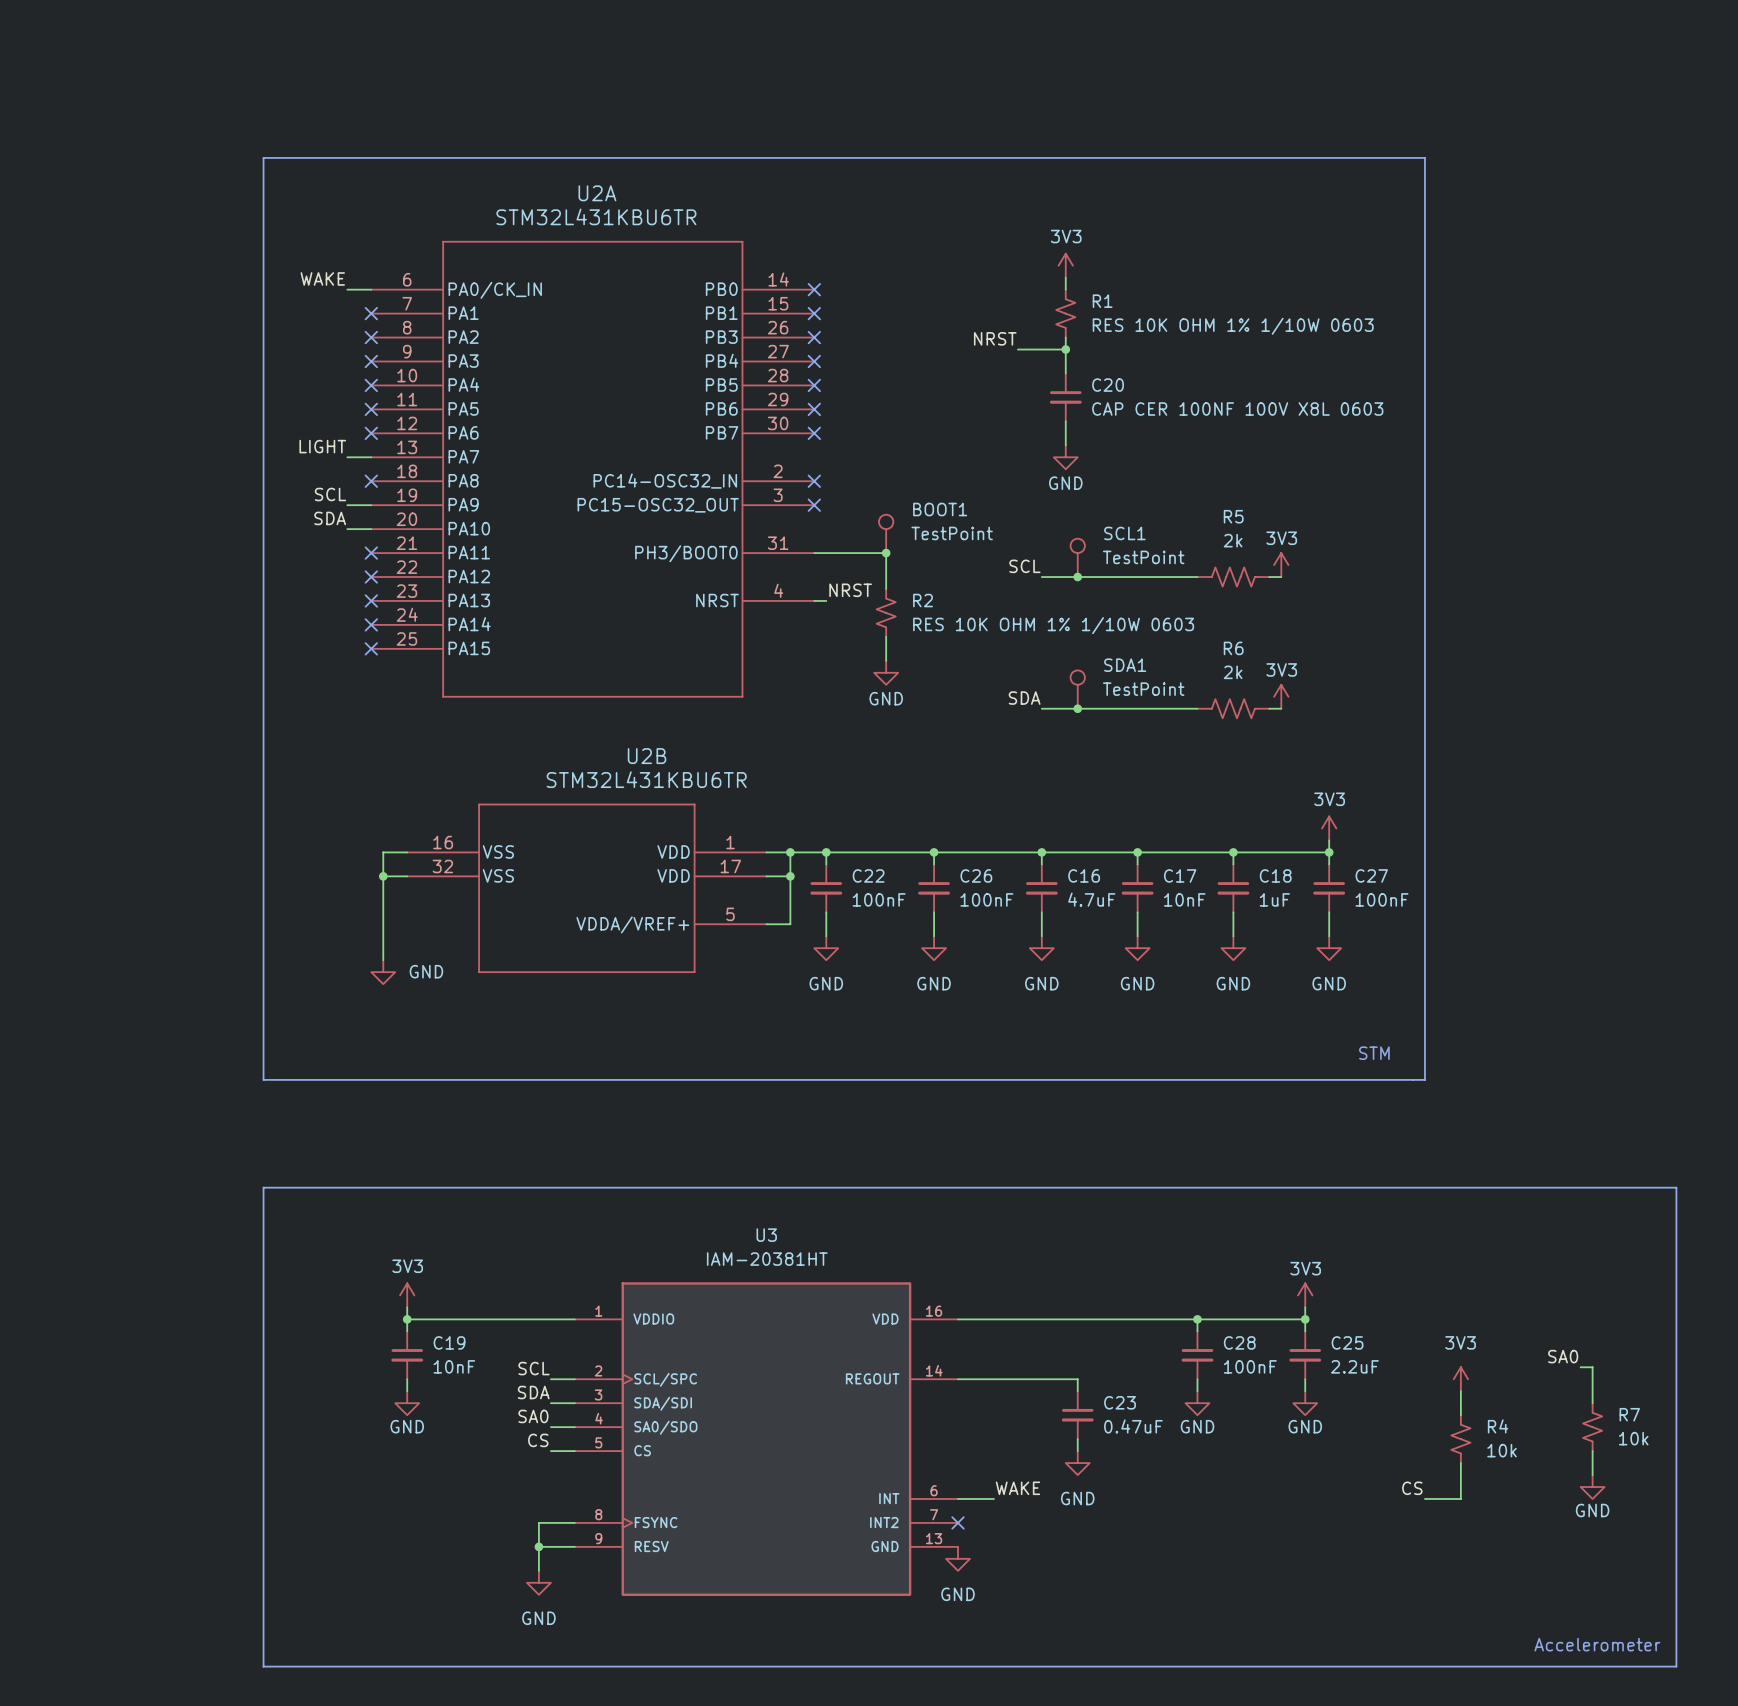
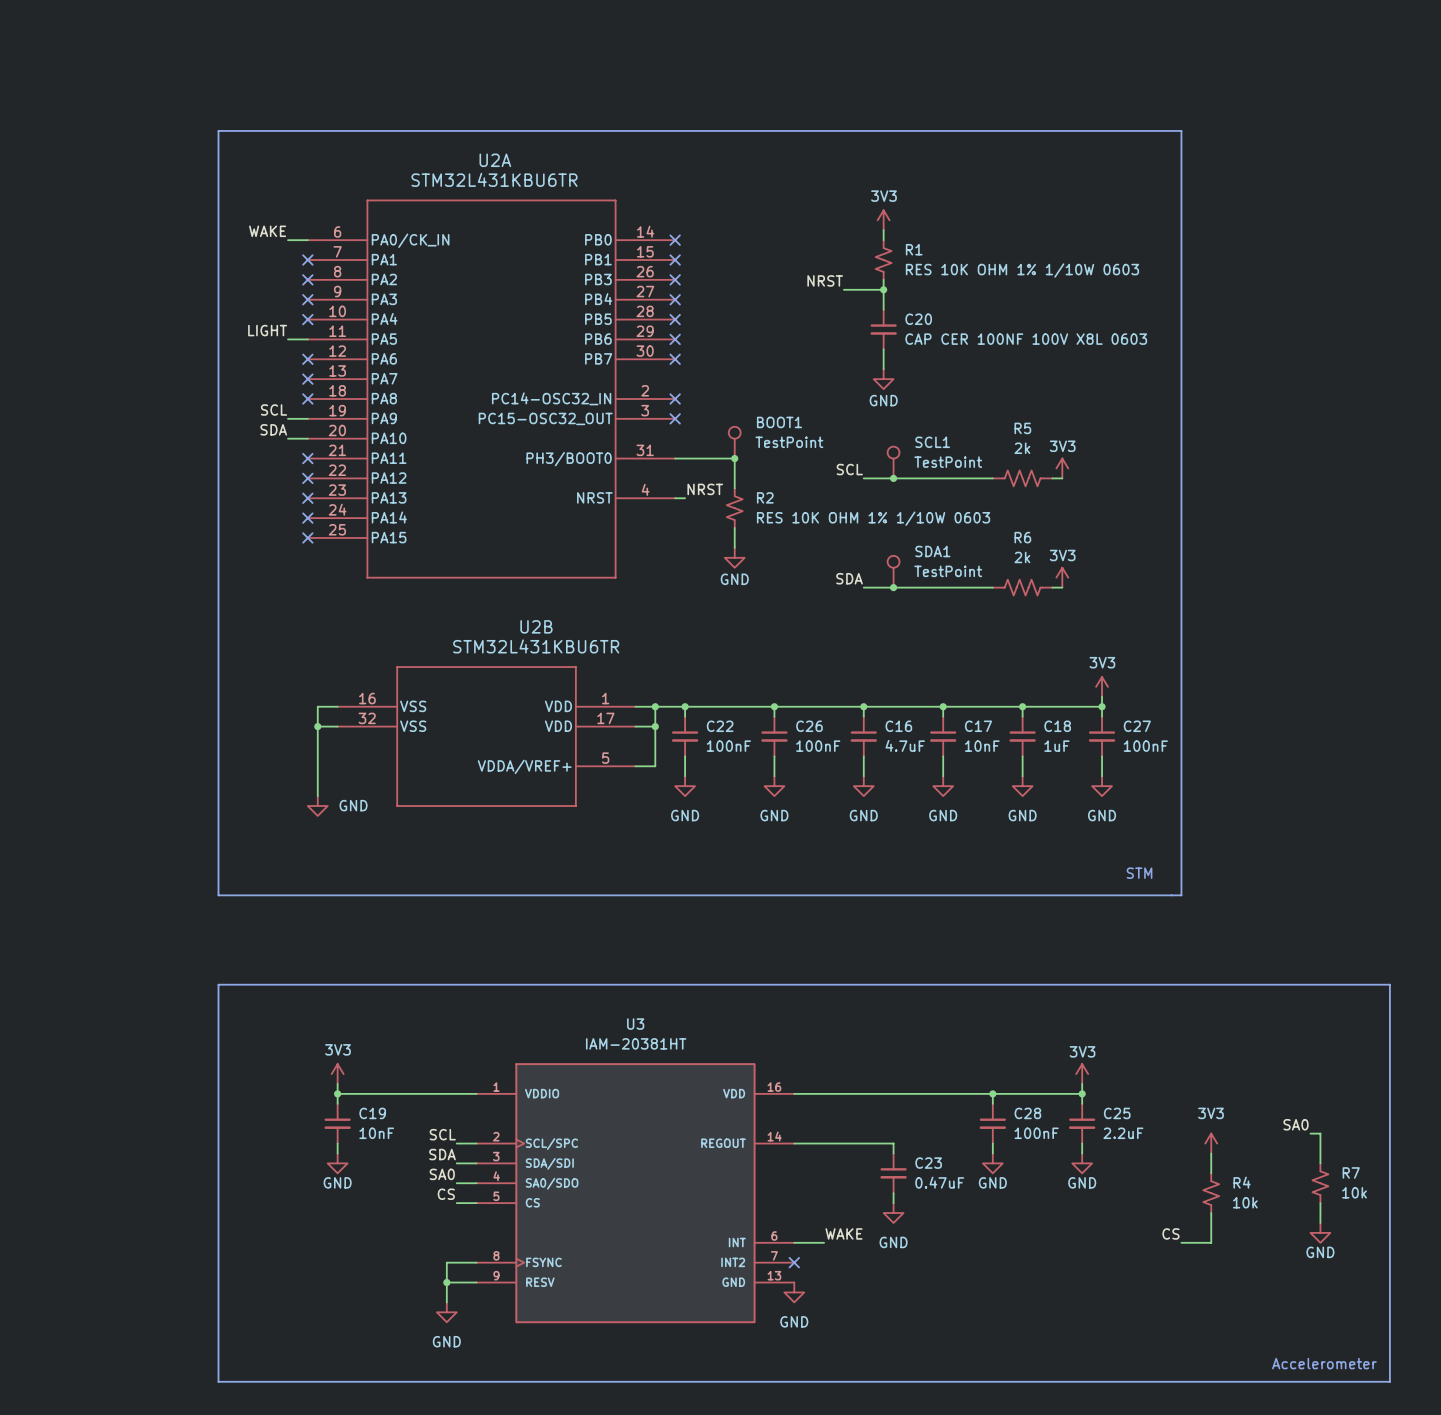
no-connect mark position: (371, 409) -> (307, 379)
label position: LIGHT (322, 446) -> LIGHT (267, 330)
wire: (347, 457) (371, 457) -> (287, 339) (307, 339)

